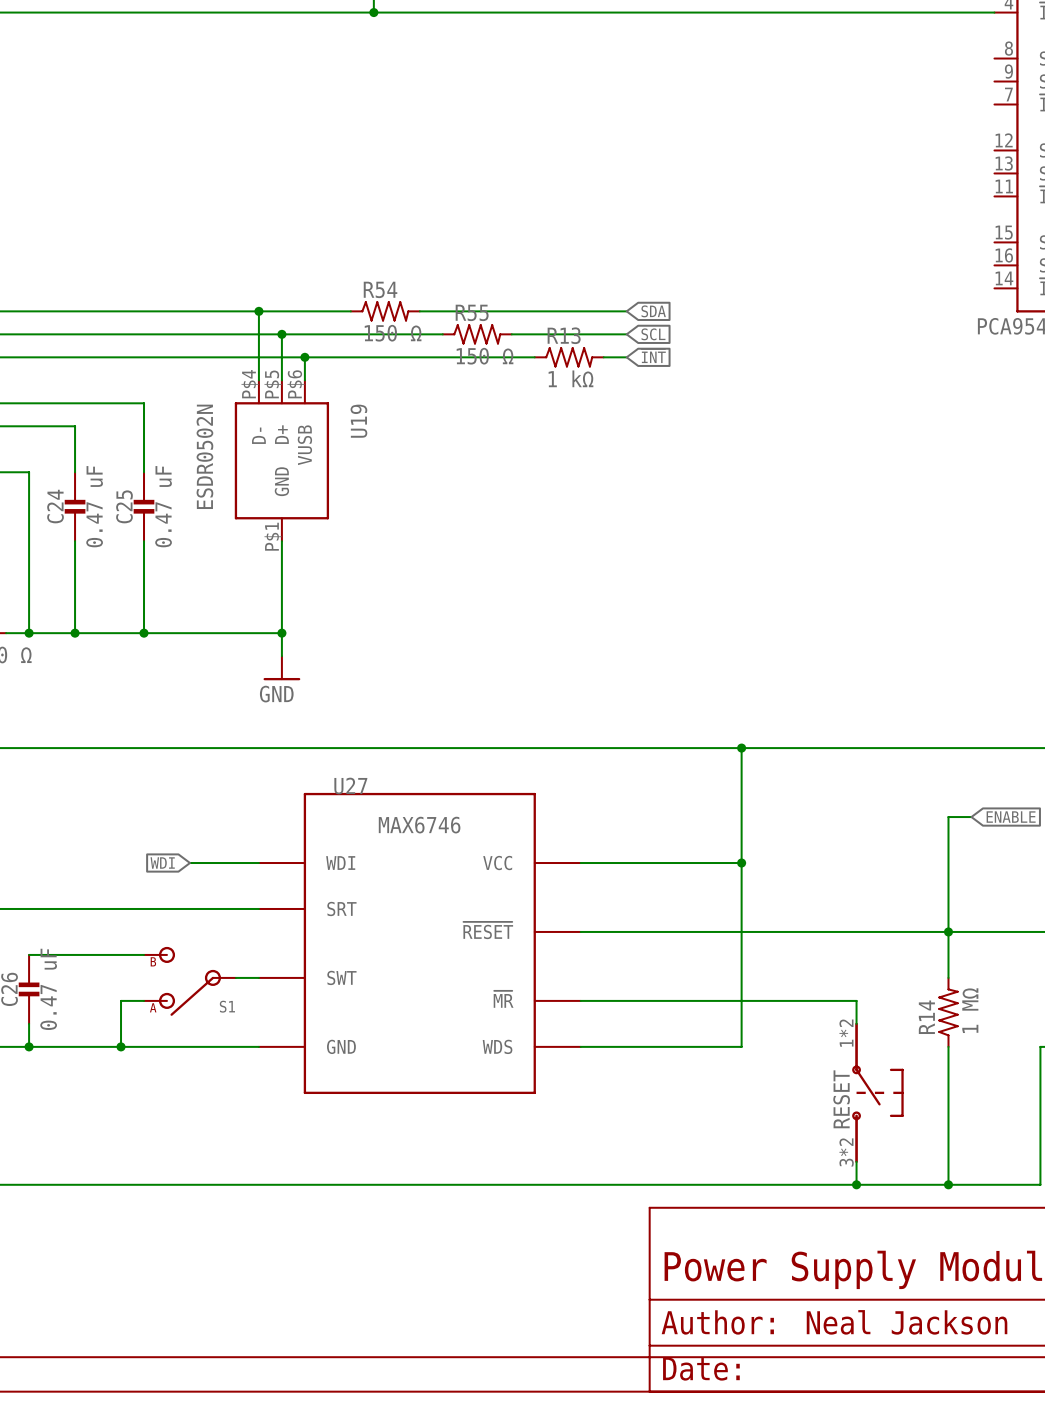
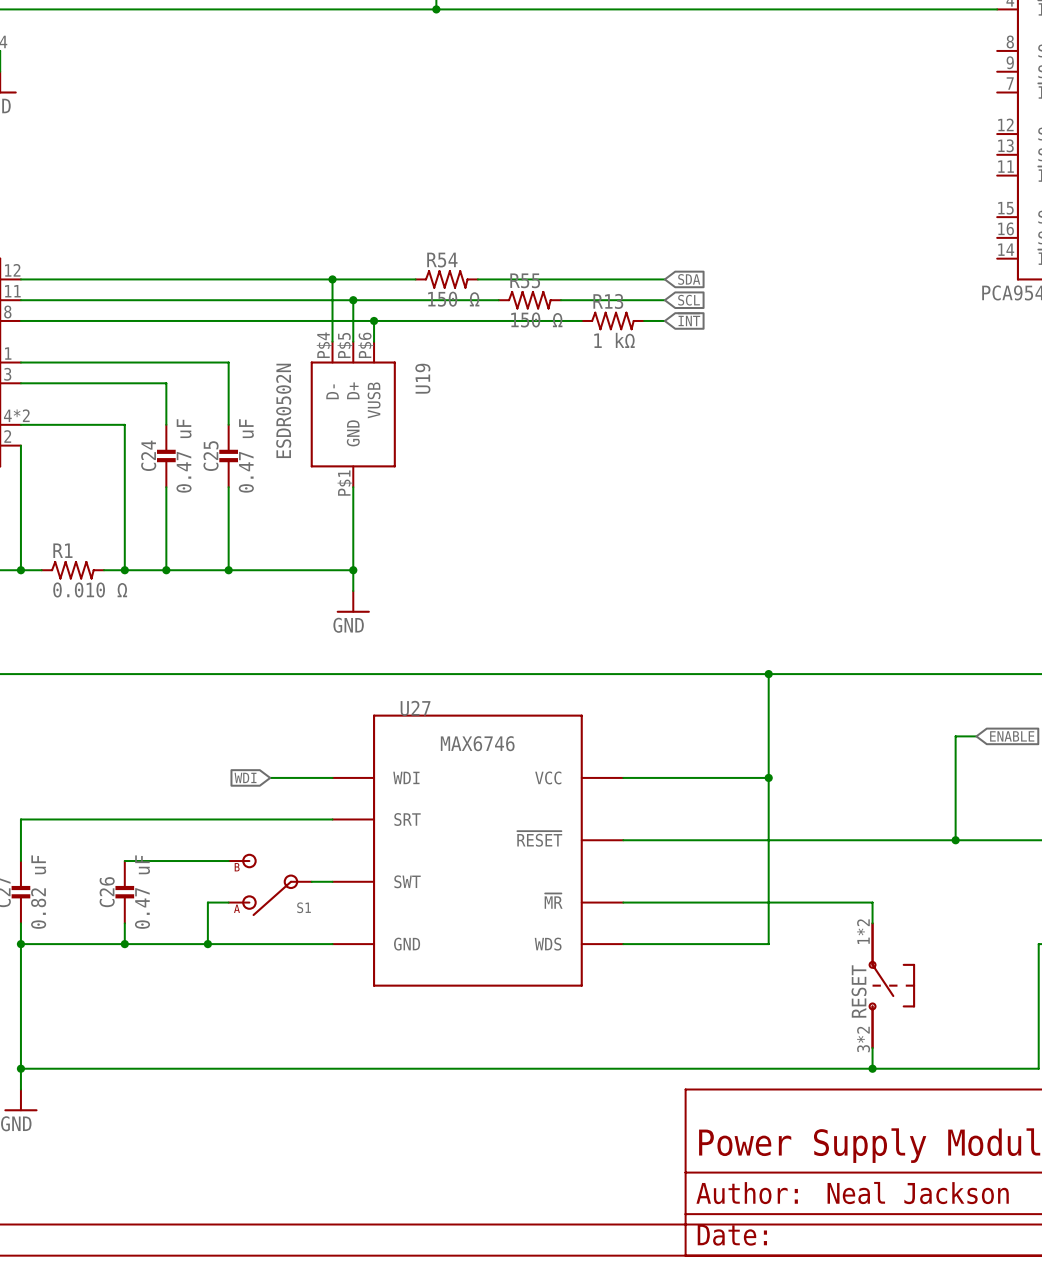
wire: (948, 931) (948, 977) -> none
R14: 1 MΩ (948, 1012) -> none
wire: (948, 1046) (948, 1184) -> none
junction: (948, 1184) -> none

